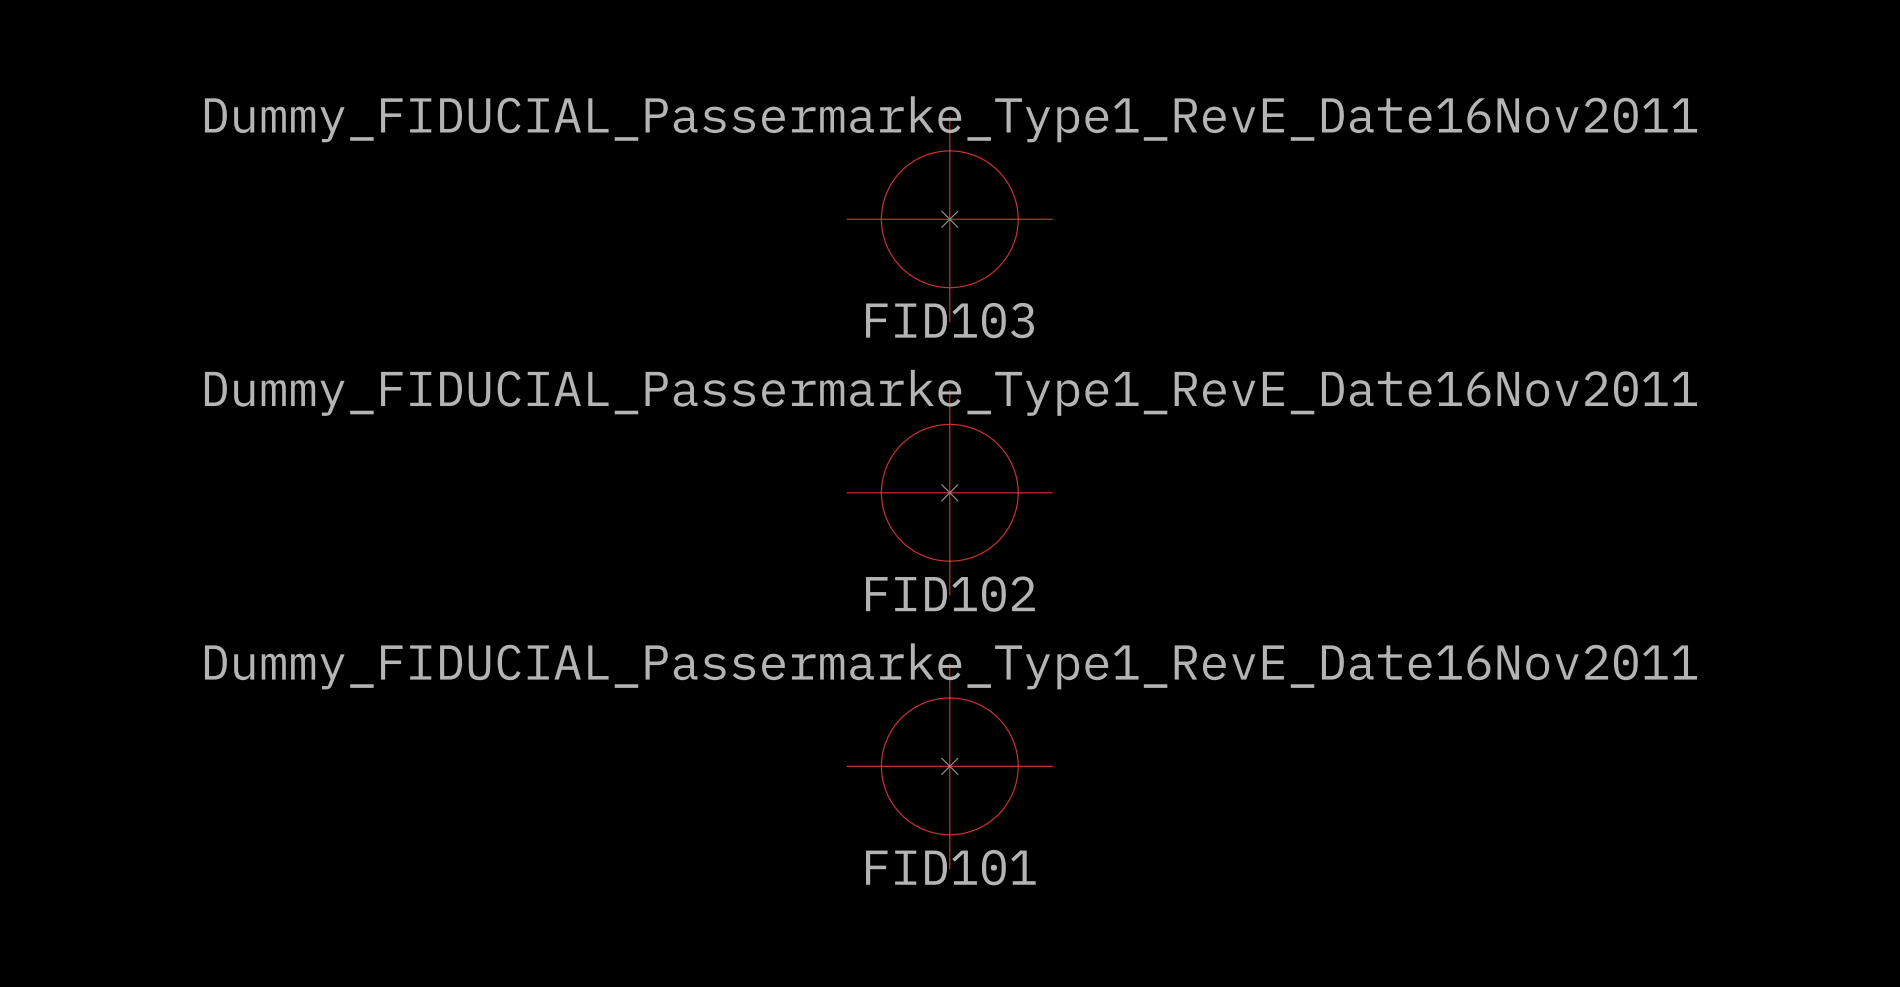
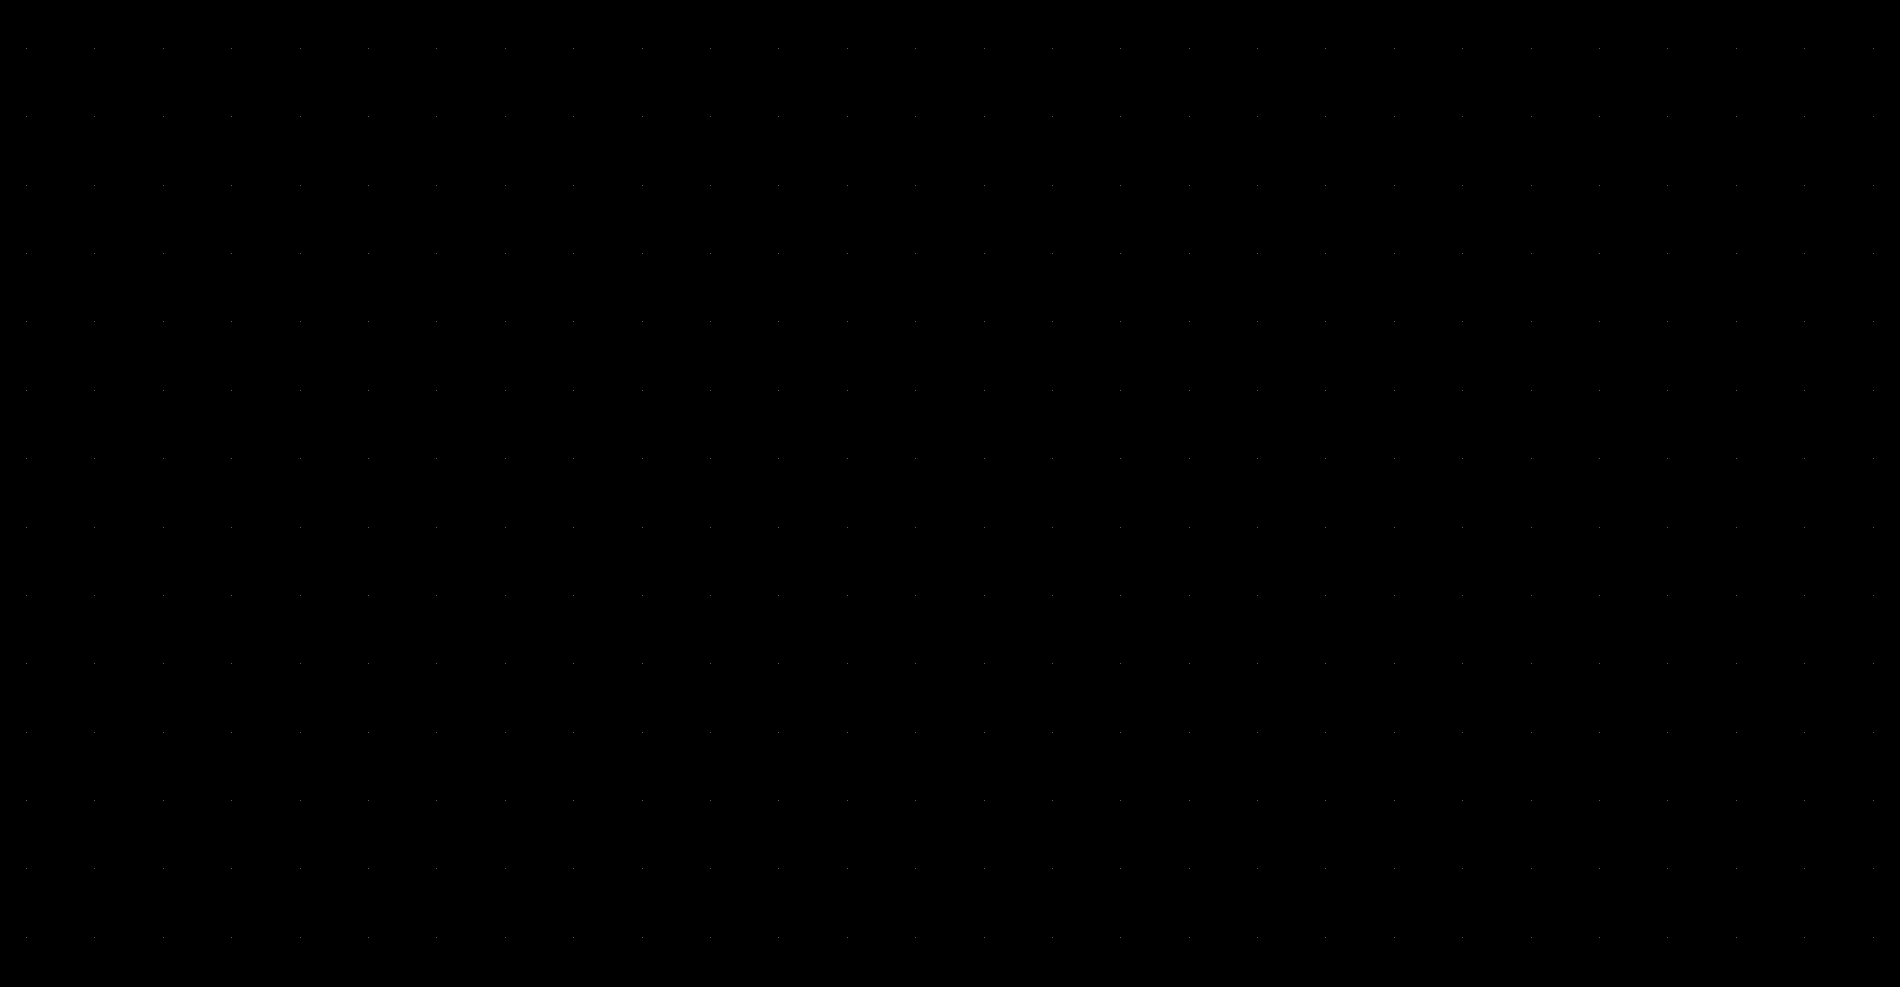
FID103: Dummy_FIDUCIAL_Passermarke_Type1_RevE_Date16Nov2011 (949, 219) -> none
FID102: Dummy_FIDUCIAL_Passermarke_Type1_RevE_Date16Nov2011 (949, 492) -> none
FID101: Dummy_FIDUCIAL_Passermarke_Type1_RevE_Date16Nov2011 (949, 766) -> none

